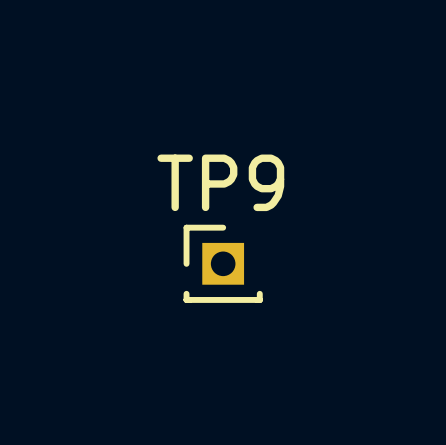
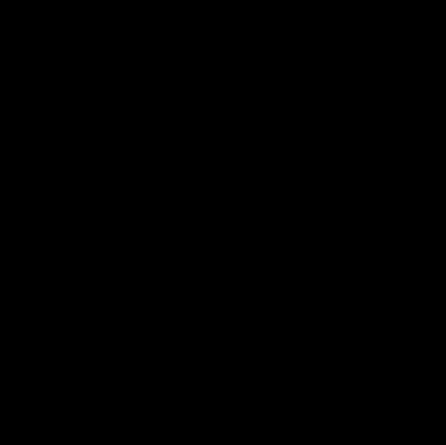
TP9: (223, 263) -> none

